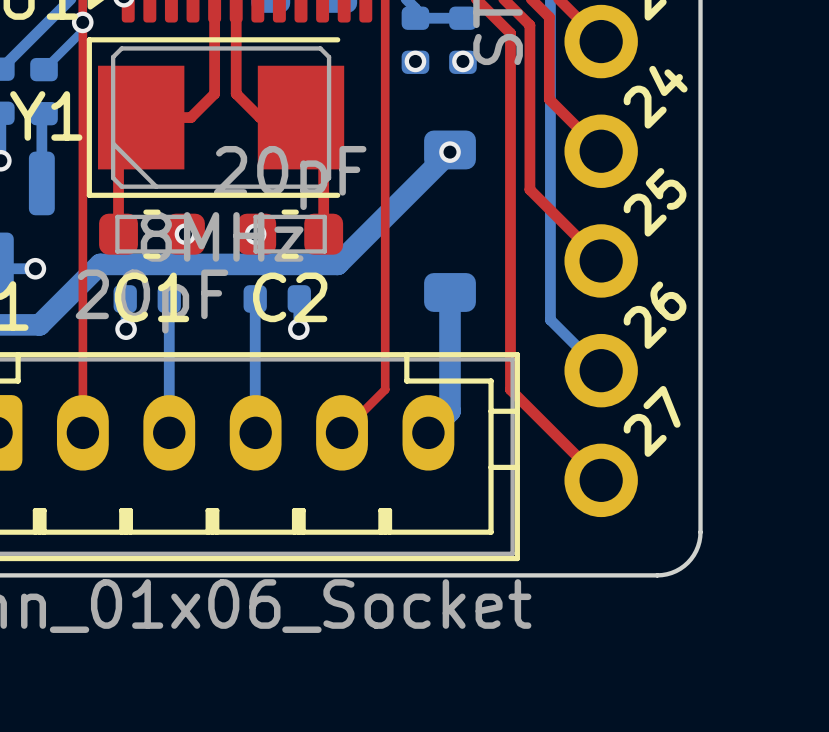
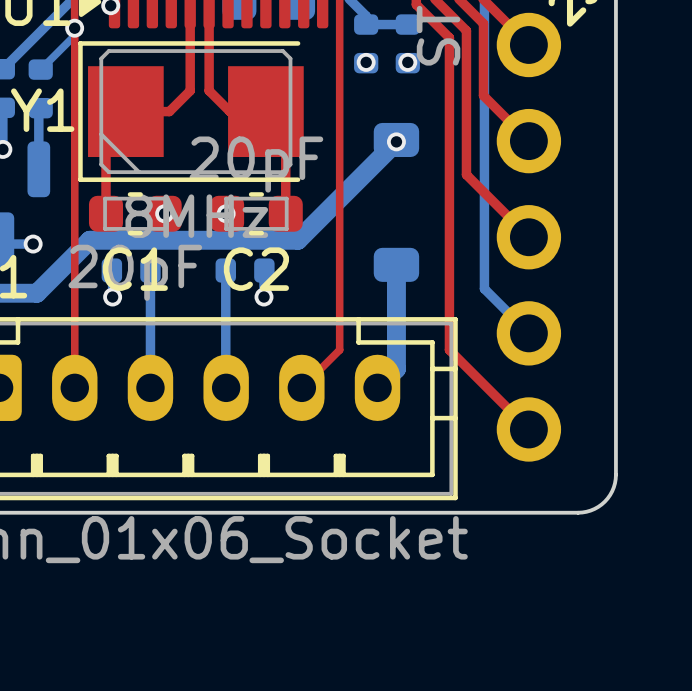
text: 24 (655, 97) -> none
text: 25 (655, 202) -> none
text: 26 (655, 315) -> none
text: 27 (652, 421) -> none

